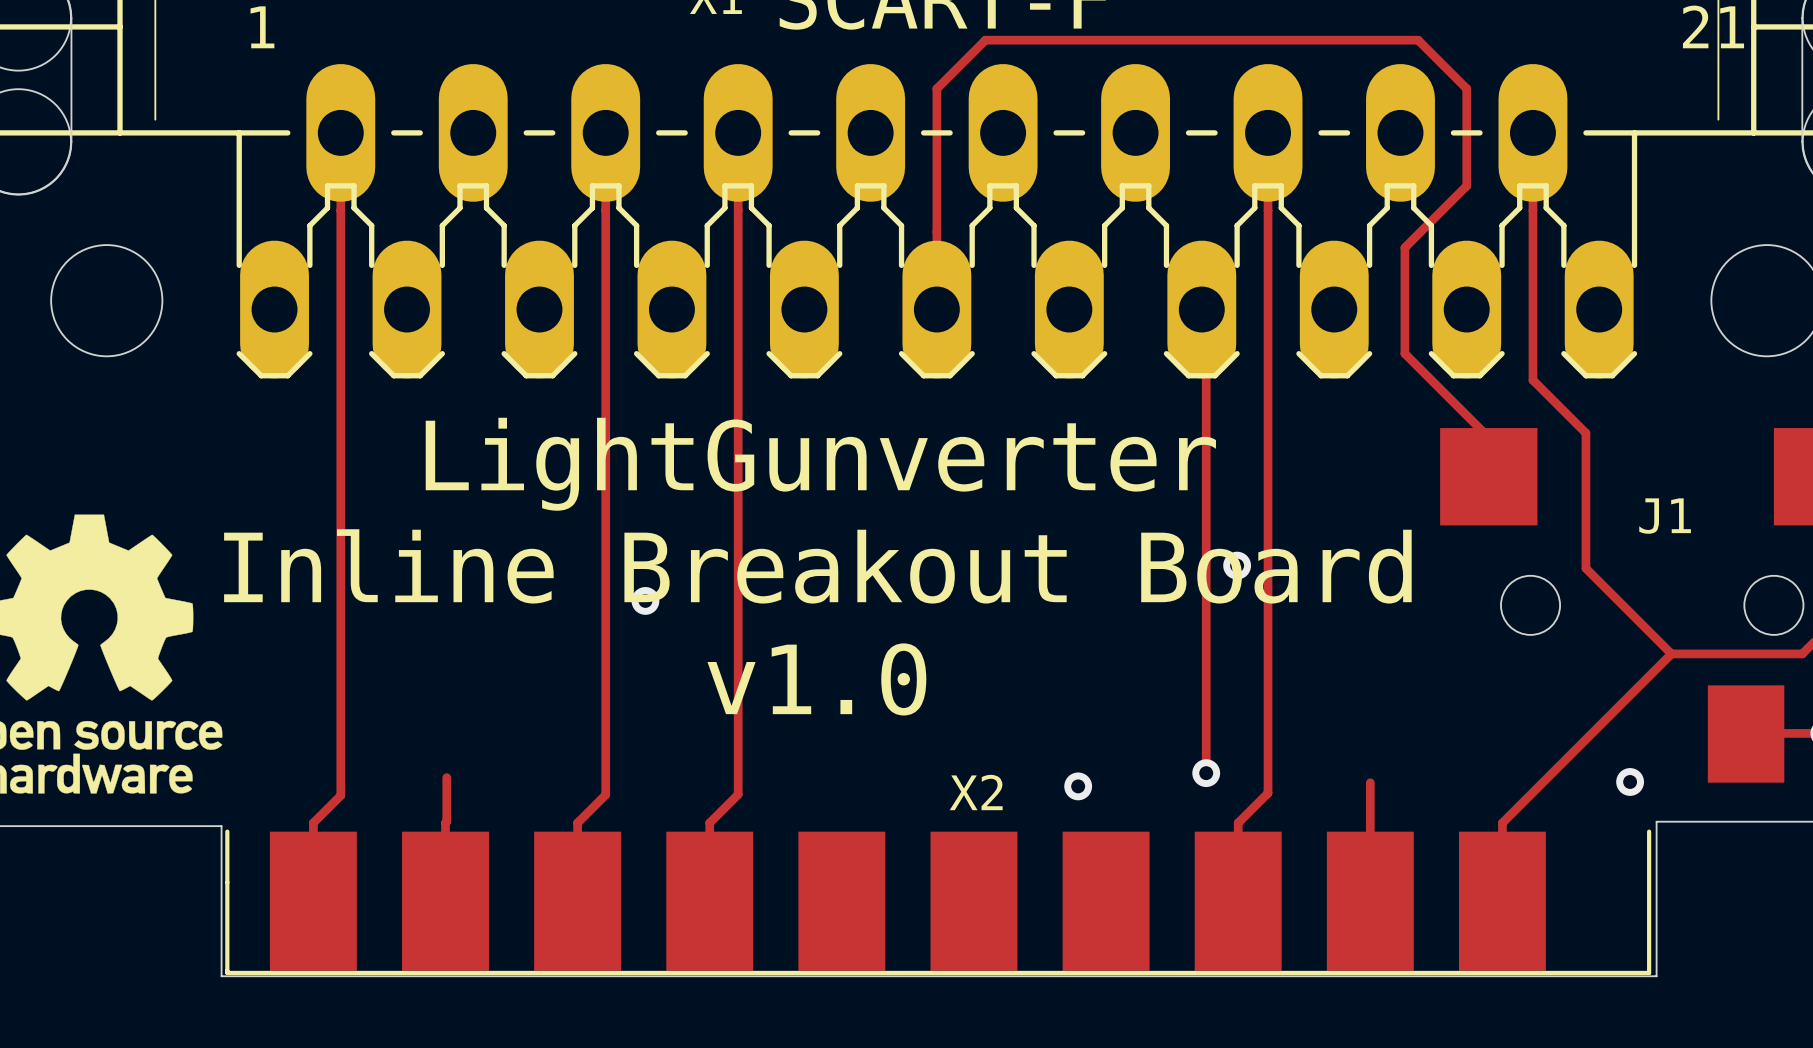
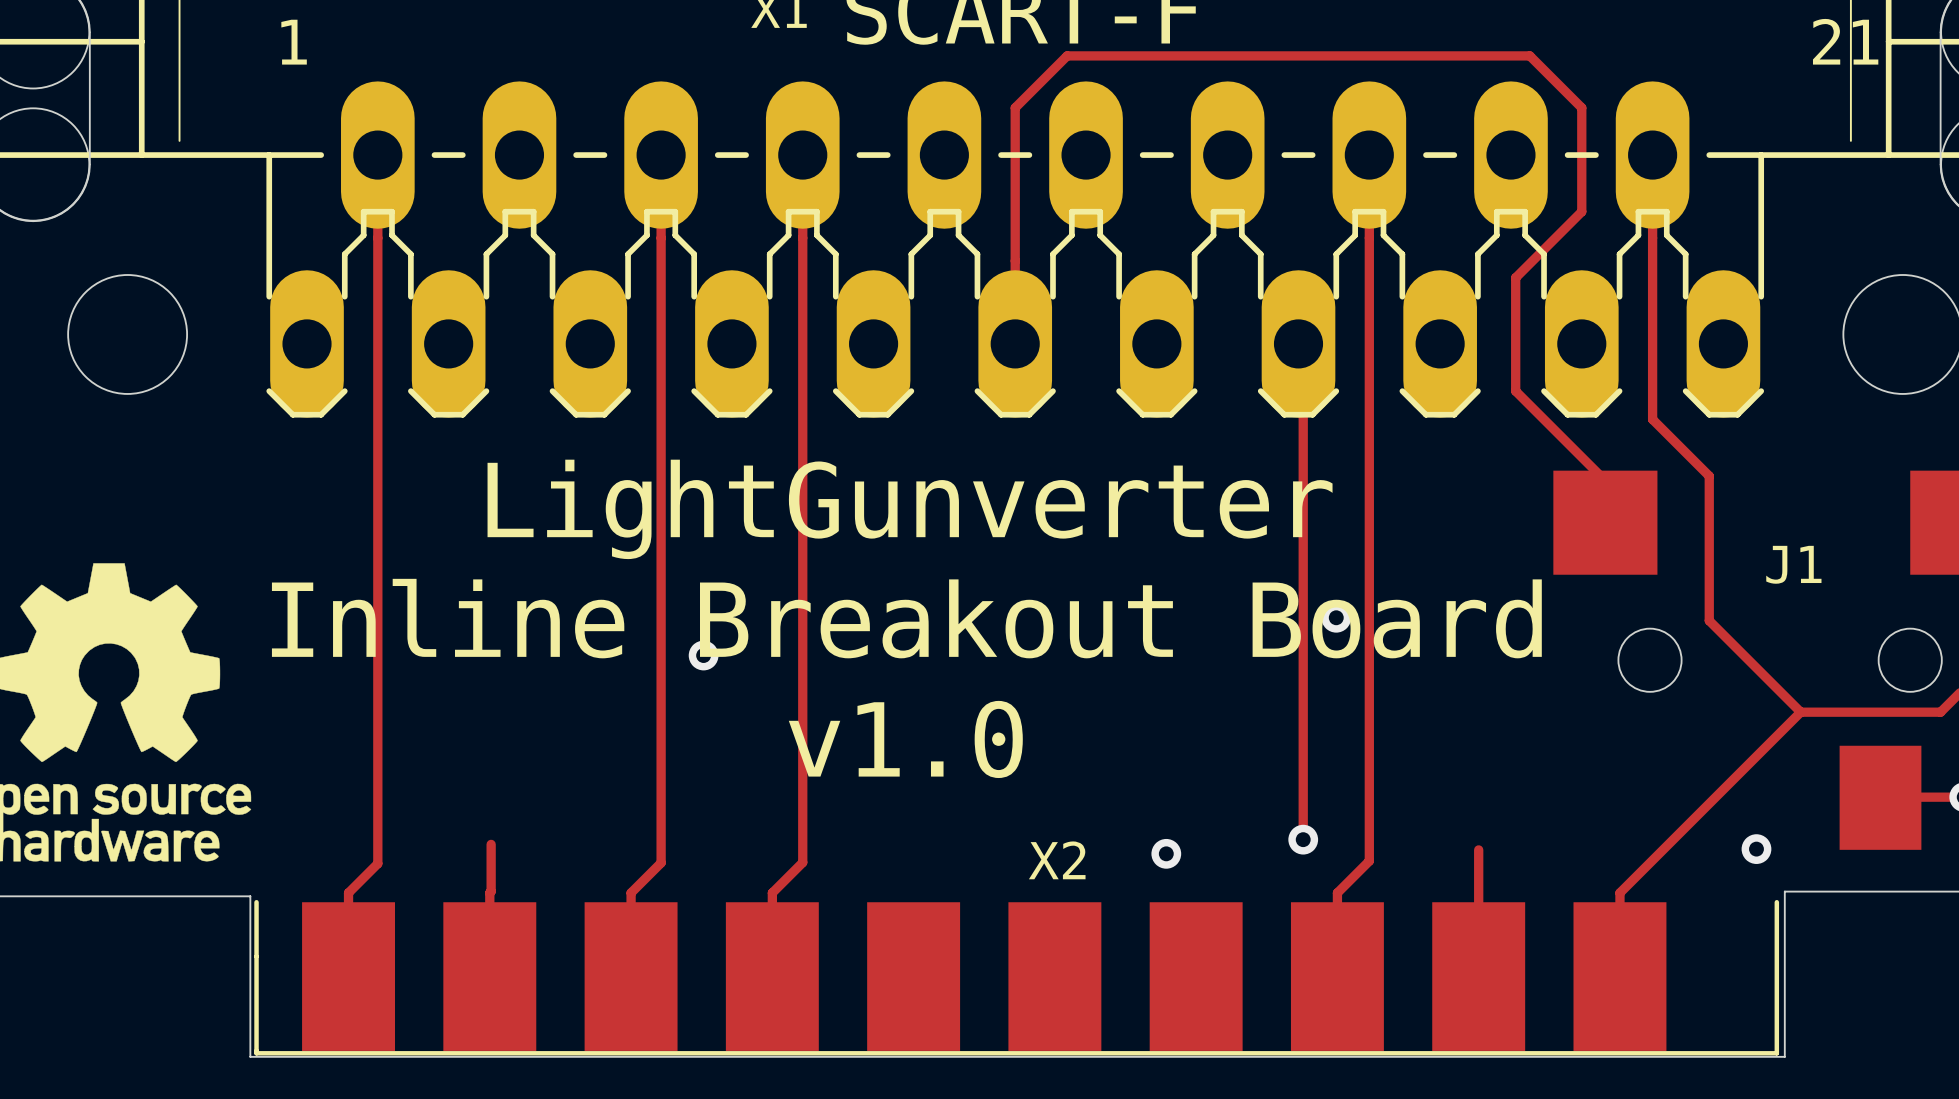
text position: LightGunverter (820, 464) -> LightGunverter (910, 509)
text position: Inline Breakout Board (817, 566) -> Inline Breakout Board (906, 618)
text position: v1.0 (816, 679) -> v1.0 (905, 739)

